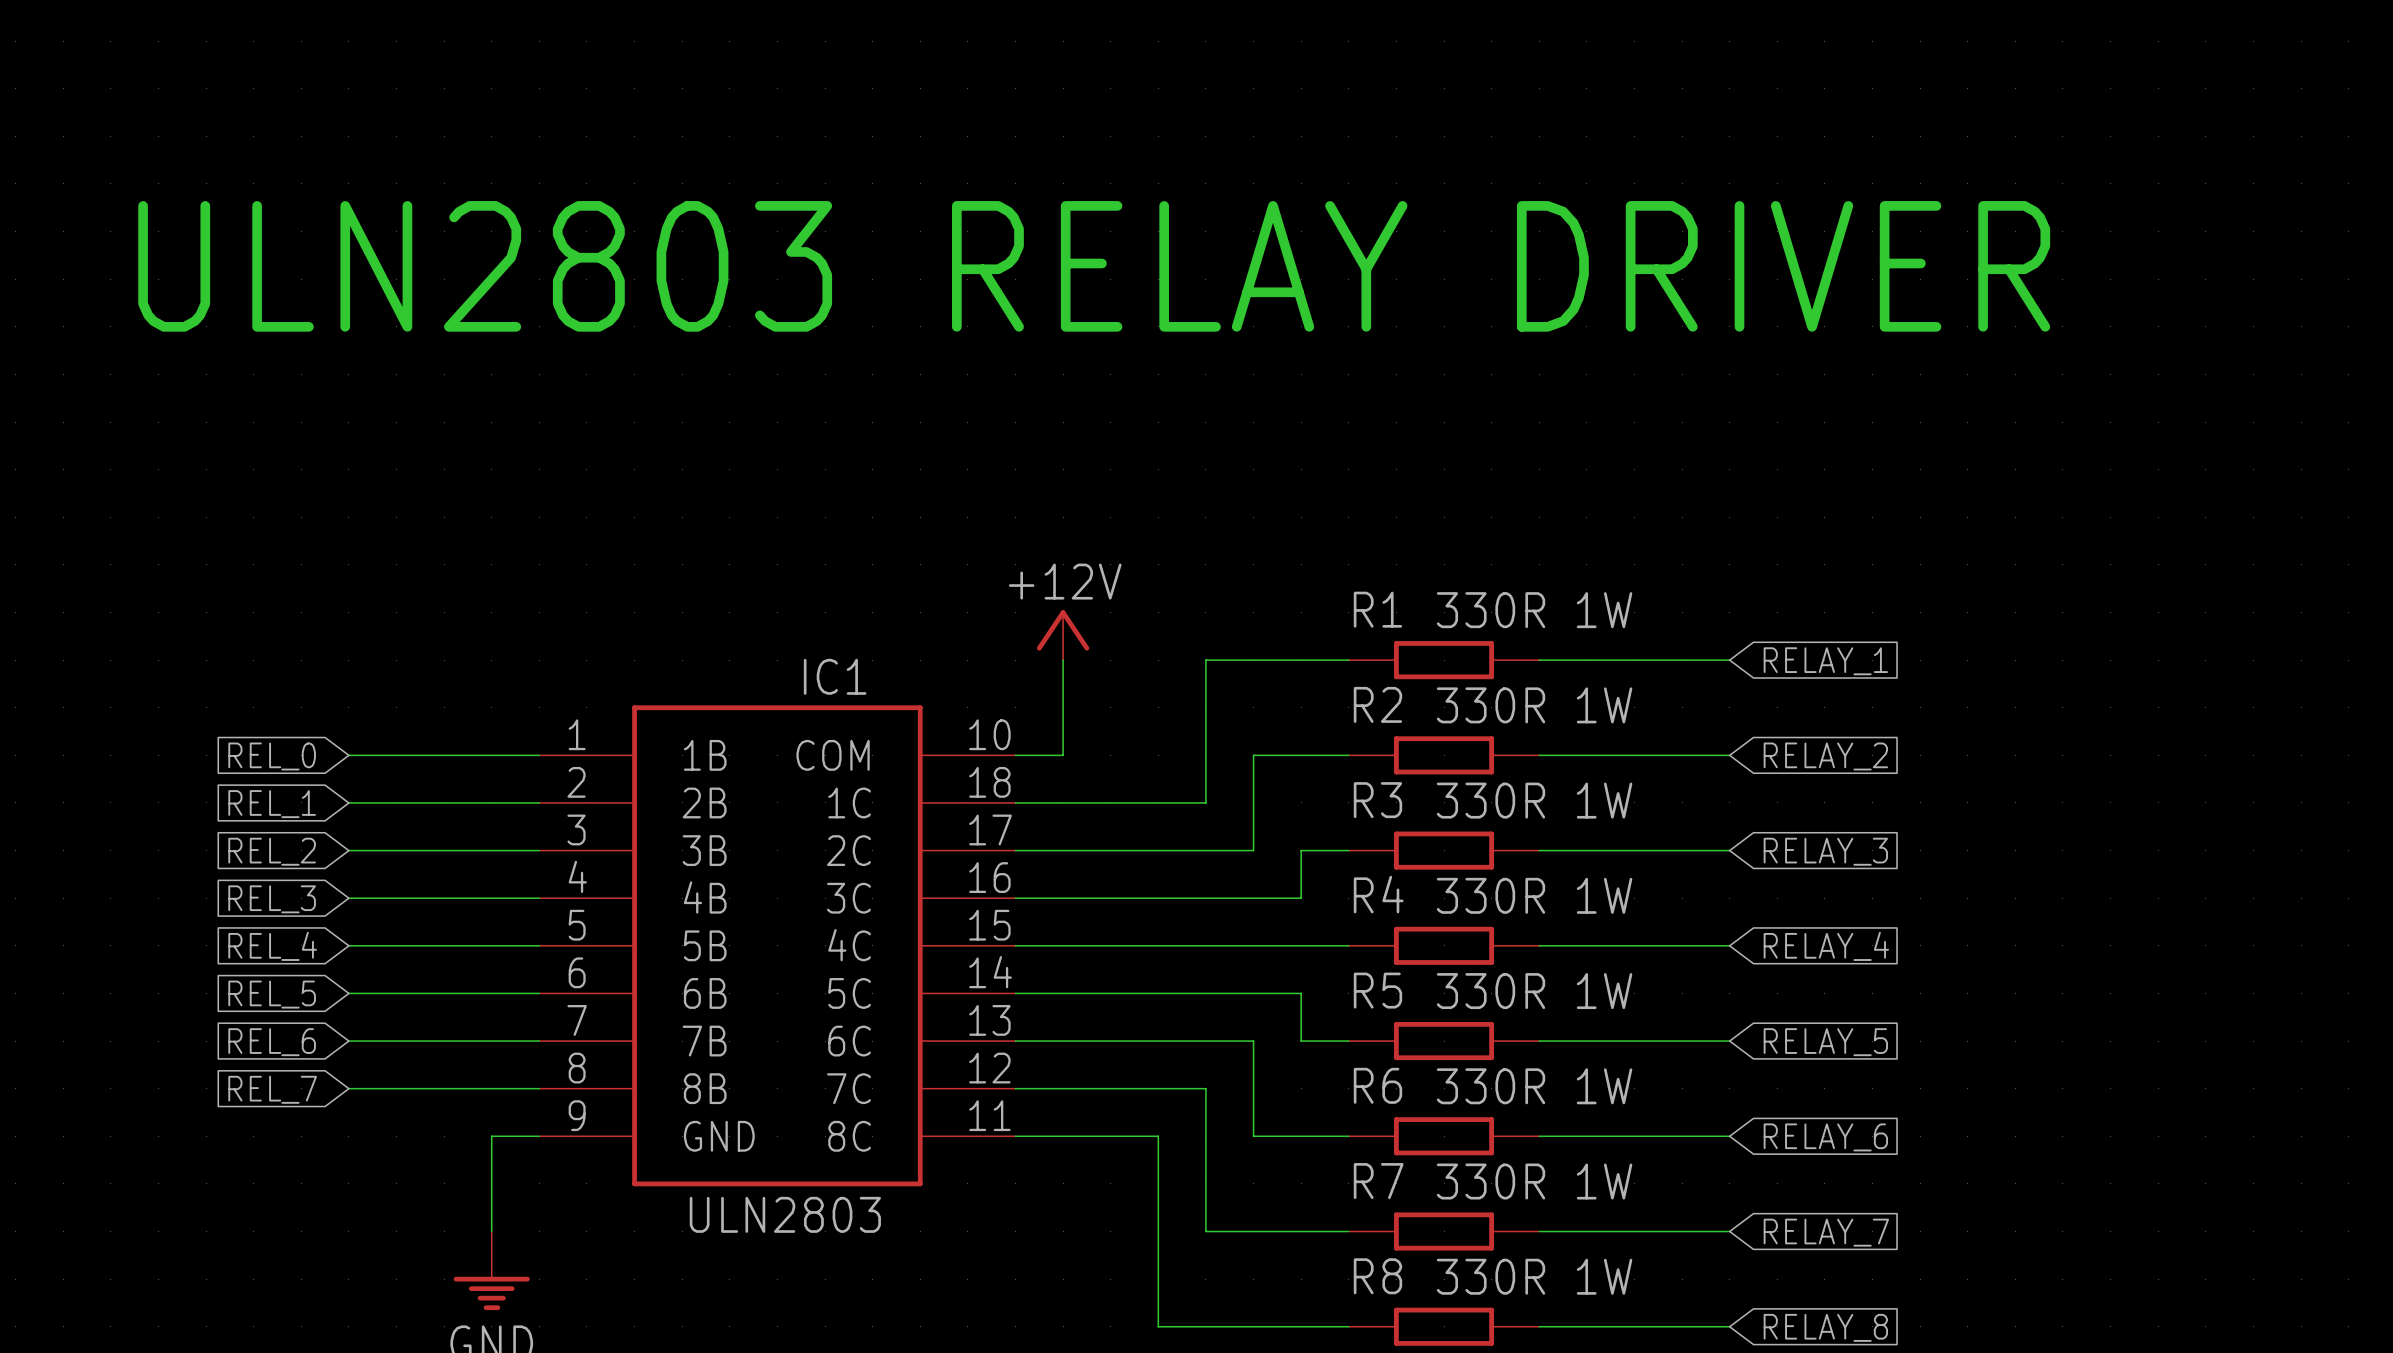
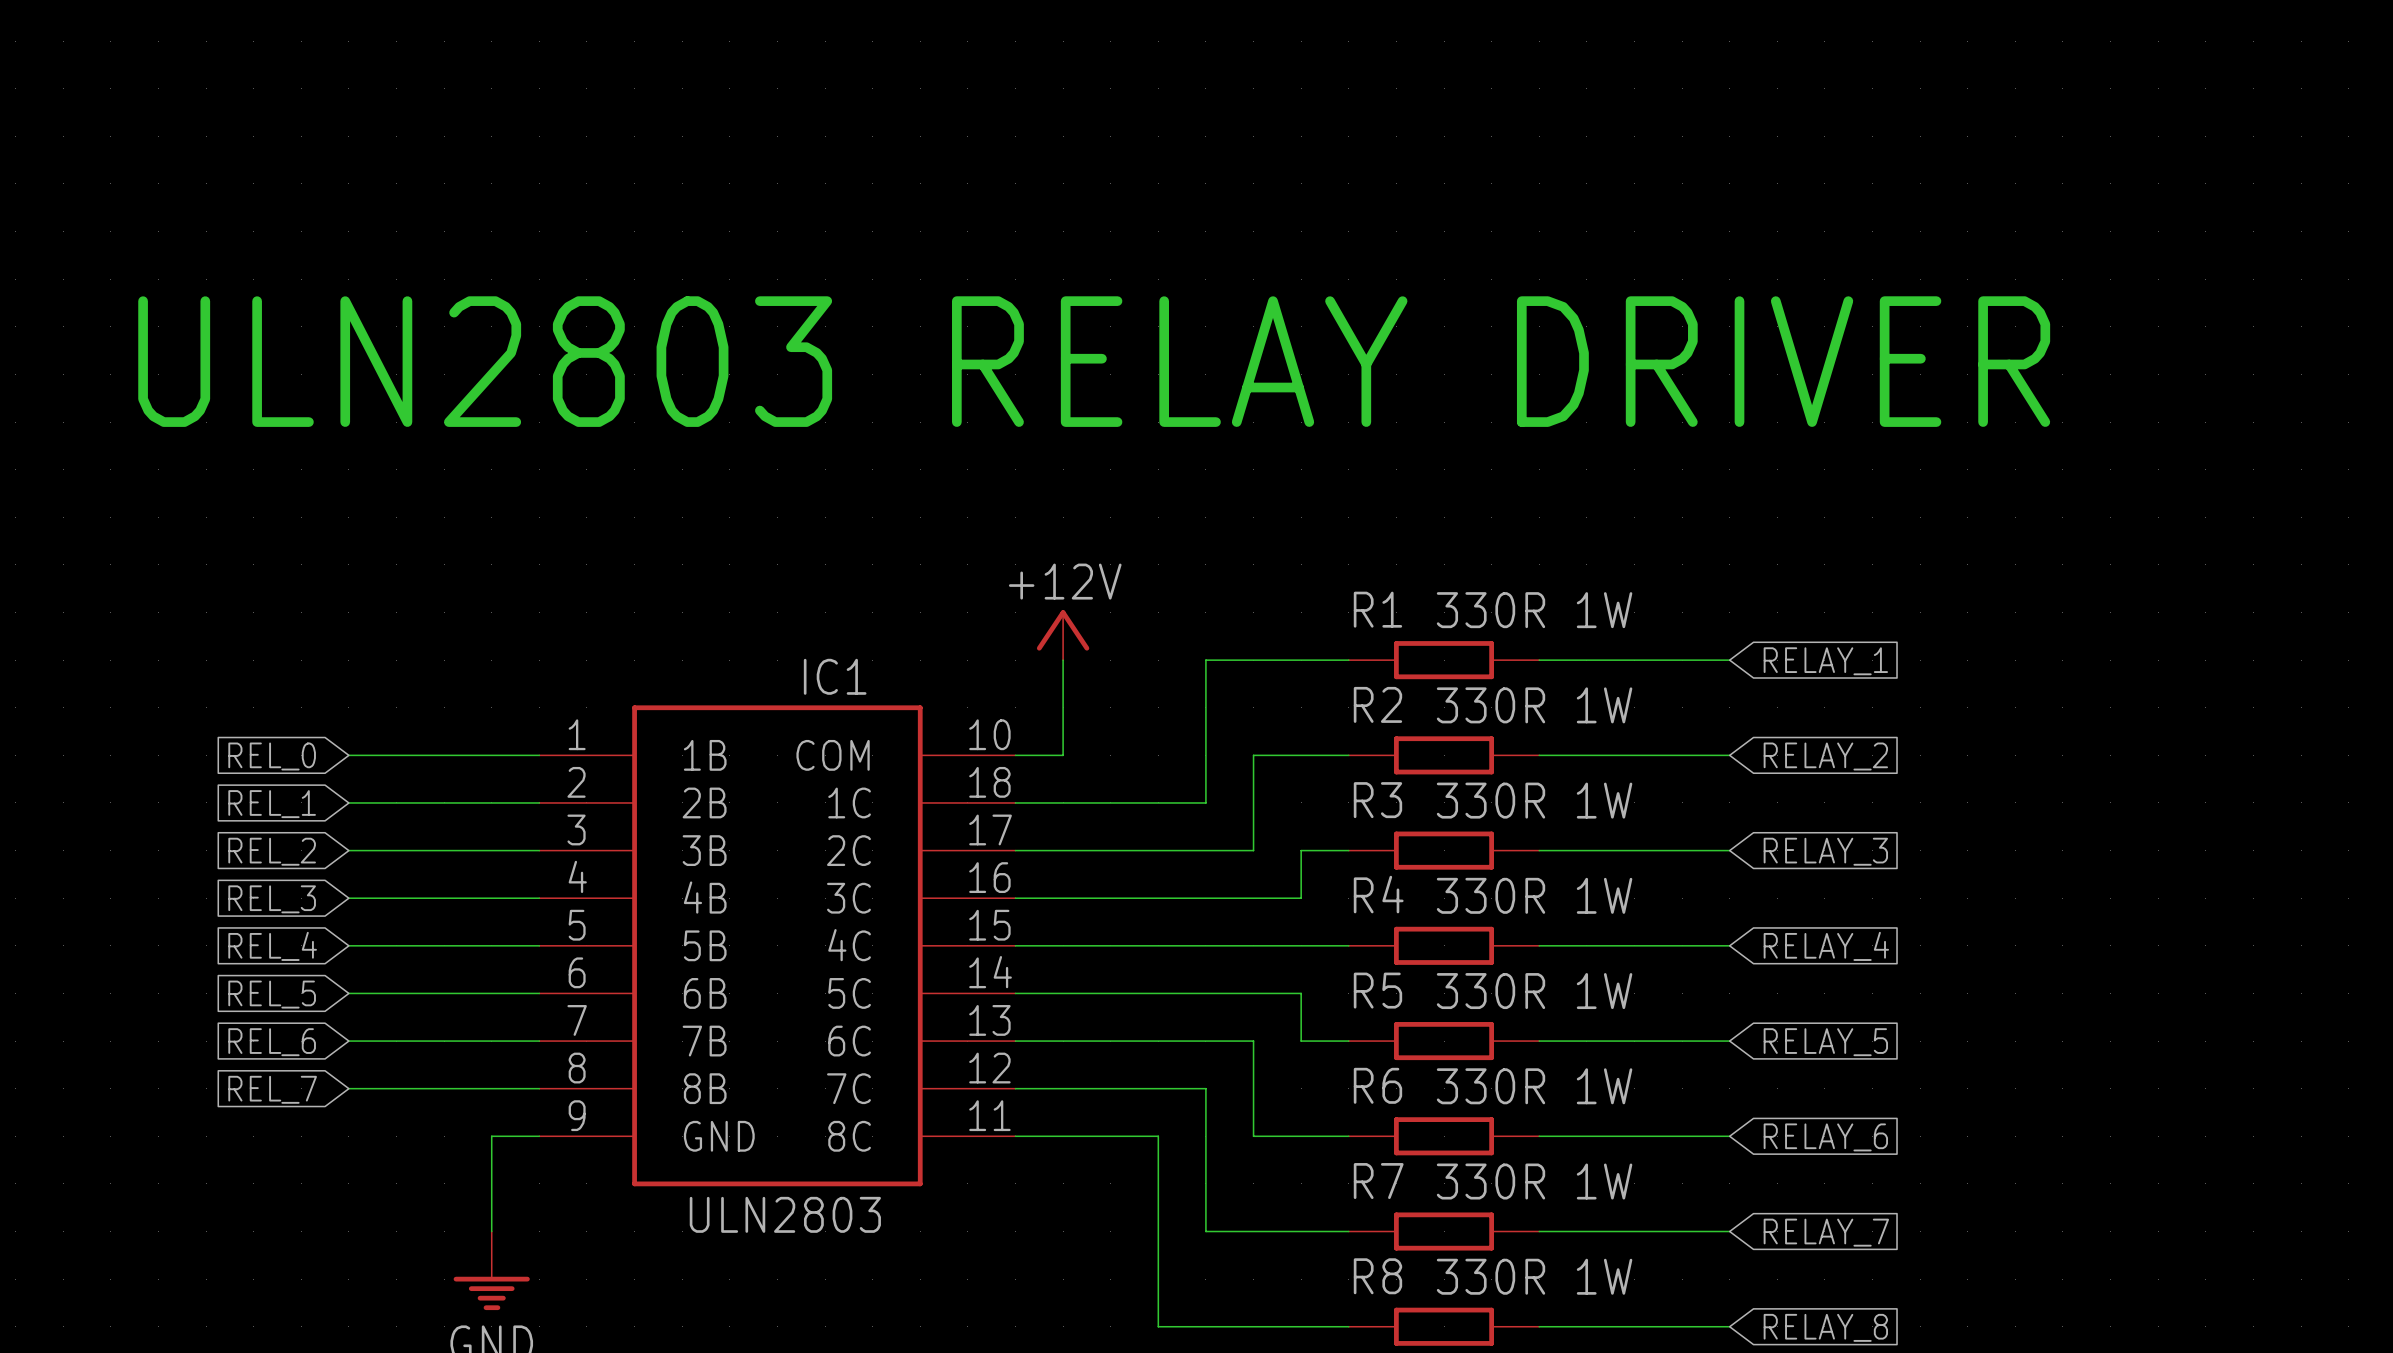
text position: ULN2803 RELAY DRIVER (1094, 266) -> ULN2803 RELAY DRIVER (1094, 361)

